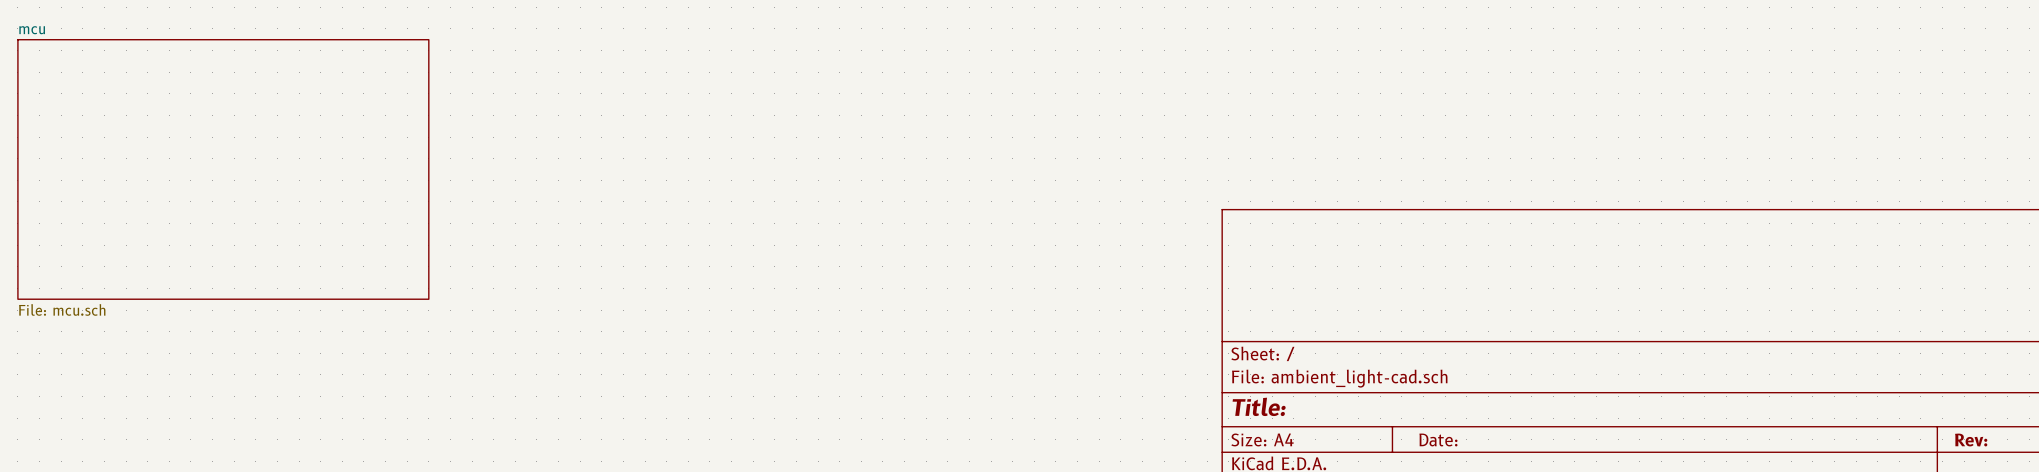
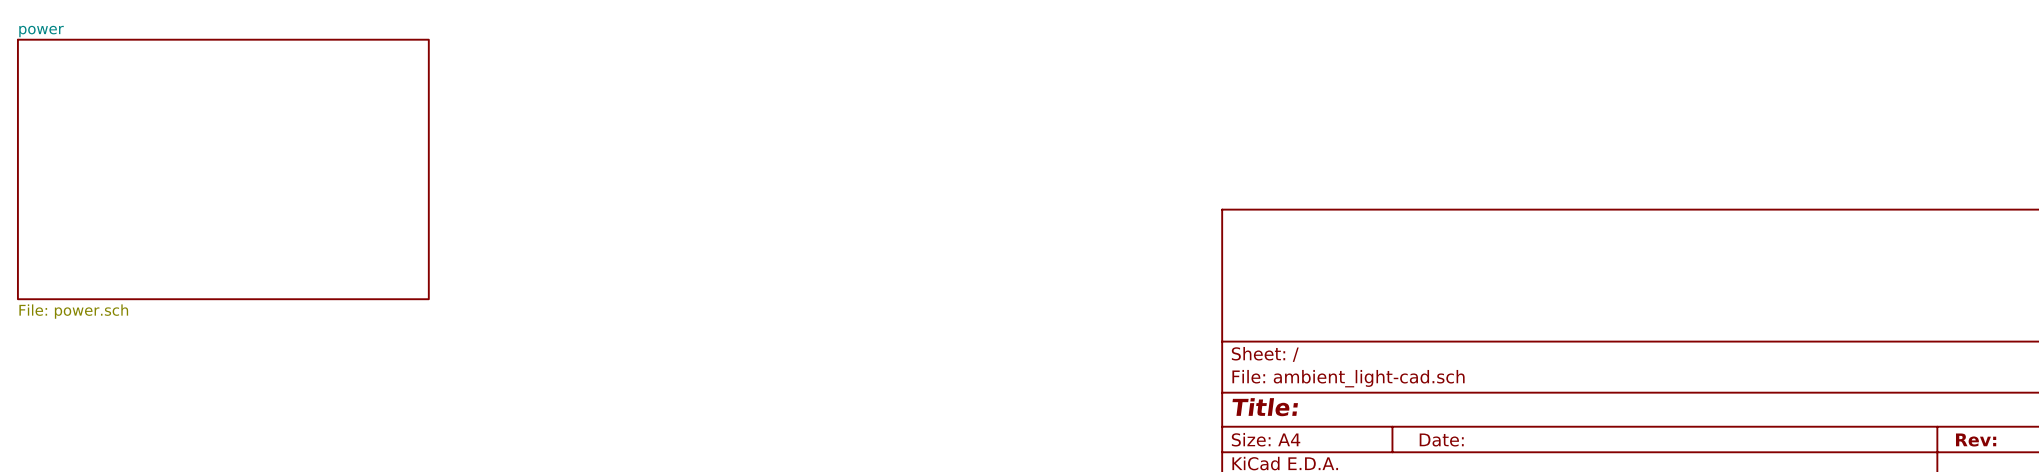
sheet mcu name: mcu (32, 30) -> power (41, 31)
sheet mcu value: File: mcu.sch (62, 309) -> File: power.sch (73, 311)

